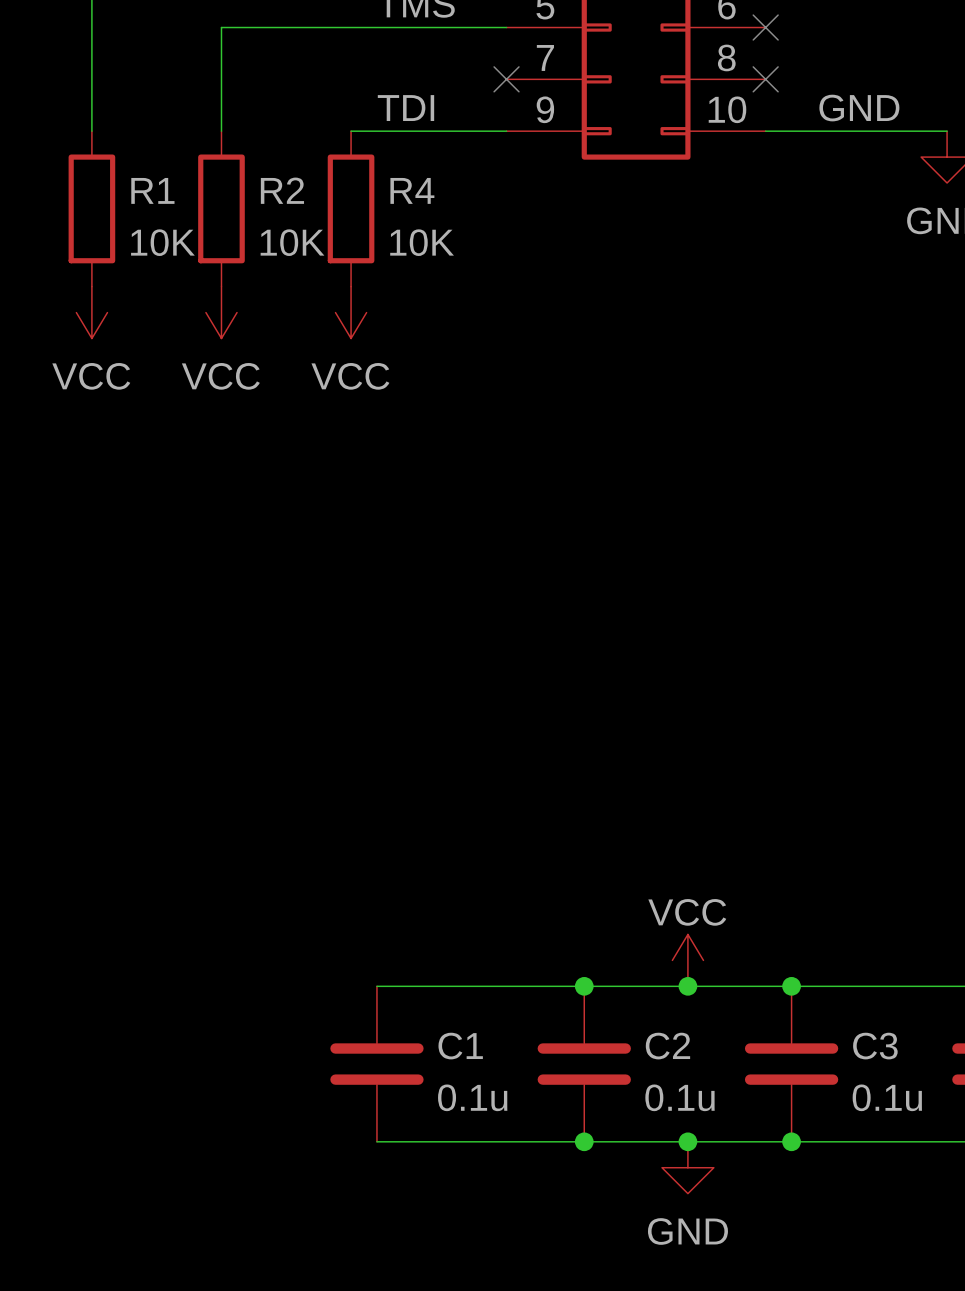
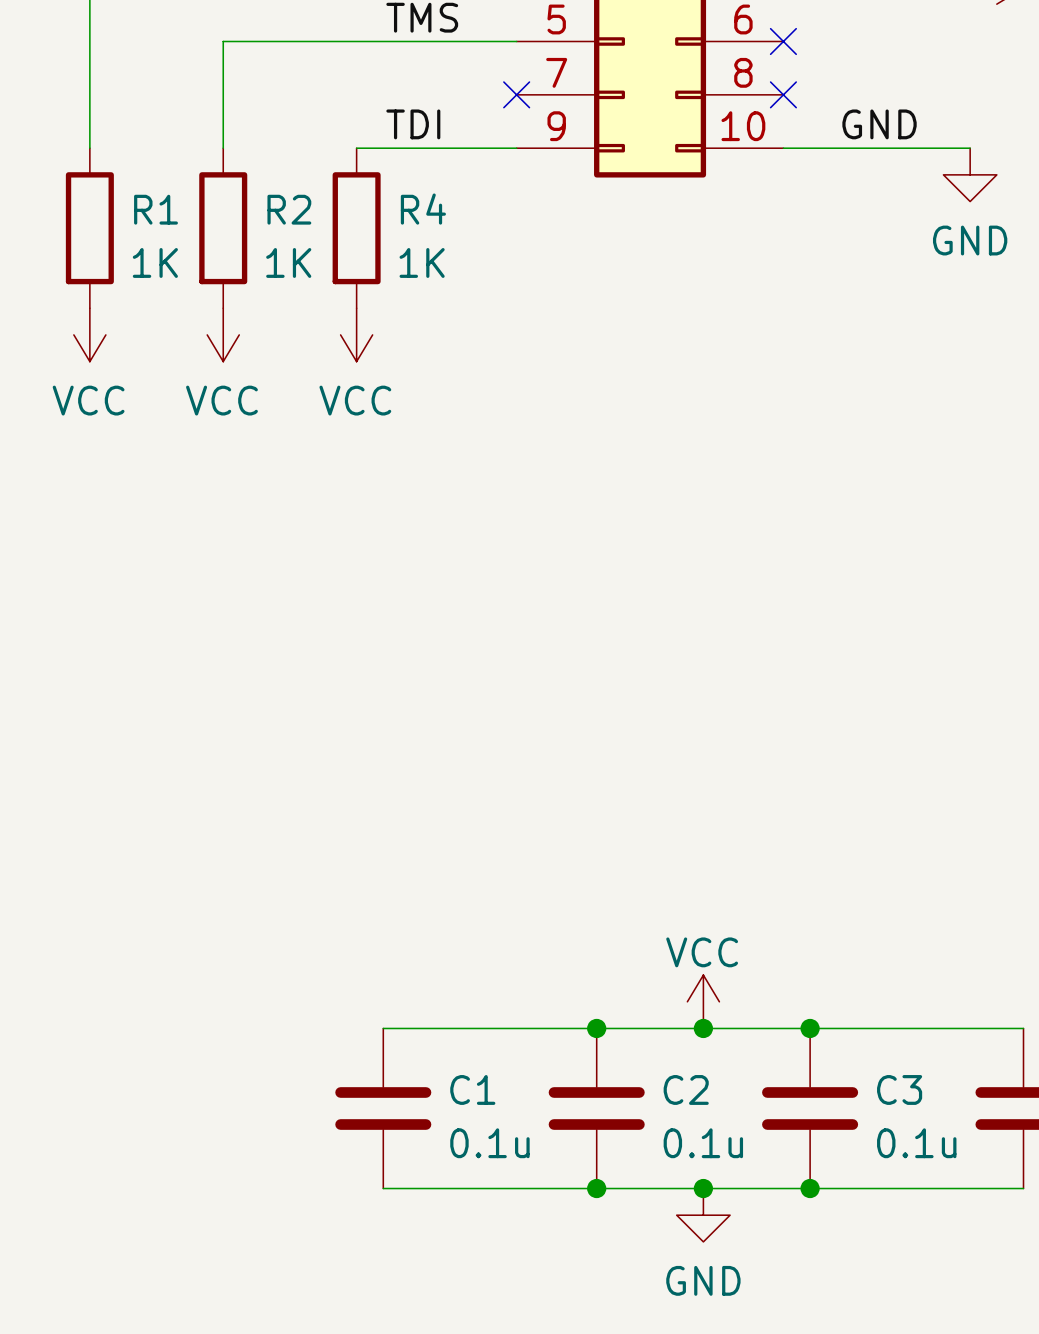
R1 value: 10K (162, 242) -> 1K (155, 262)
R2 value: 10K (292, 242) -> 1K (288, 262)
R4 value: 10K (422, 242) -> 1K (422, 262)

